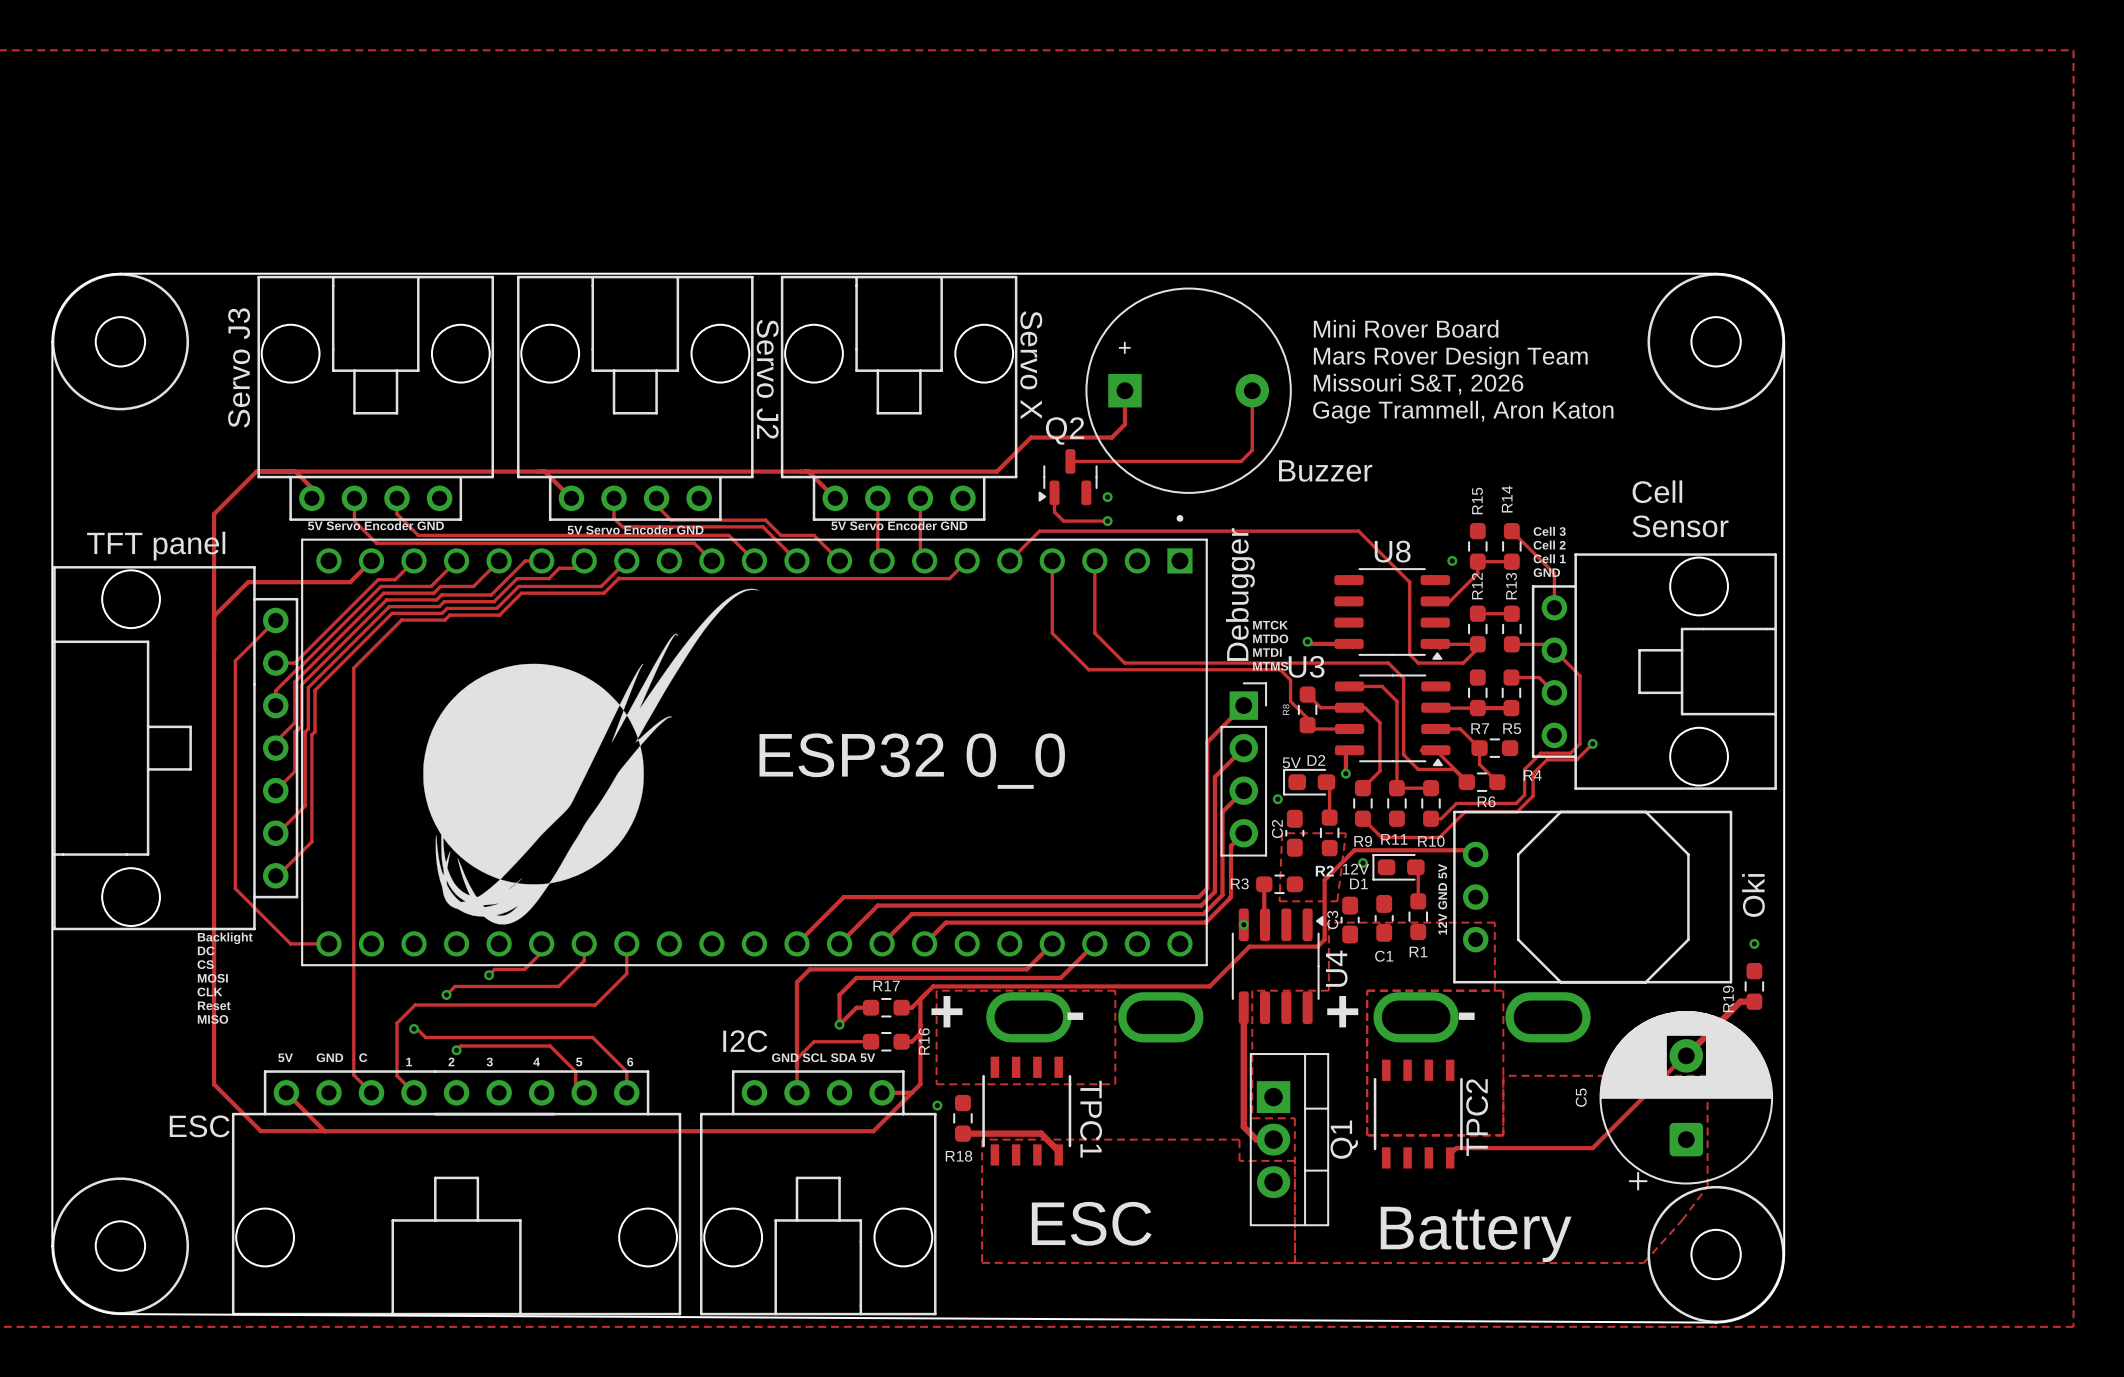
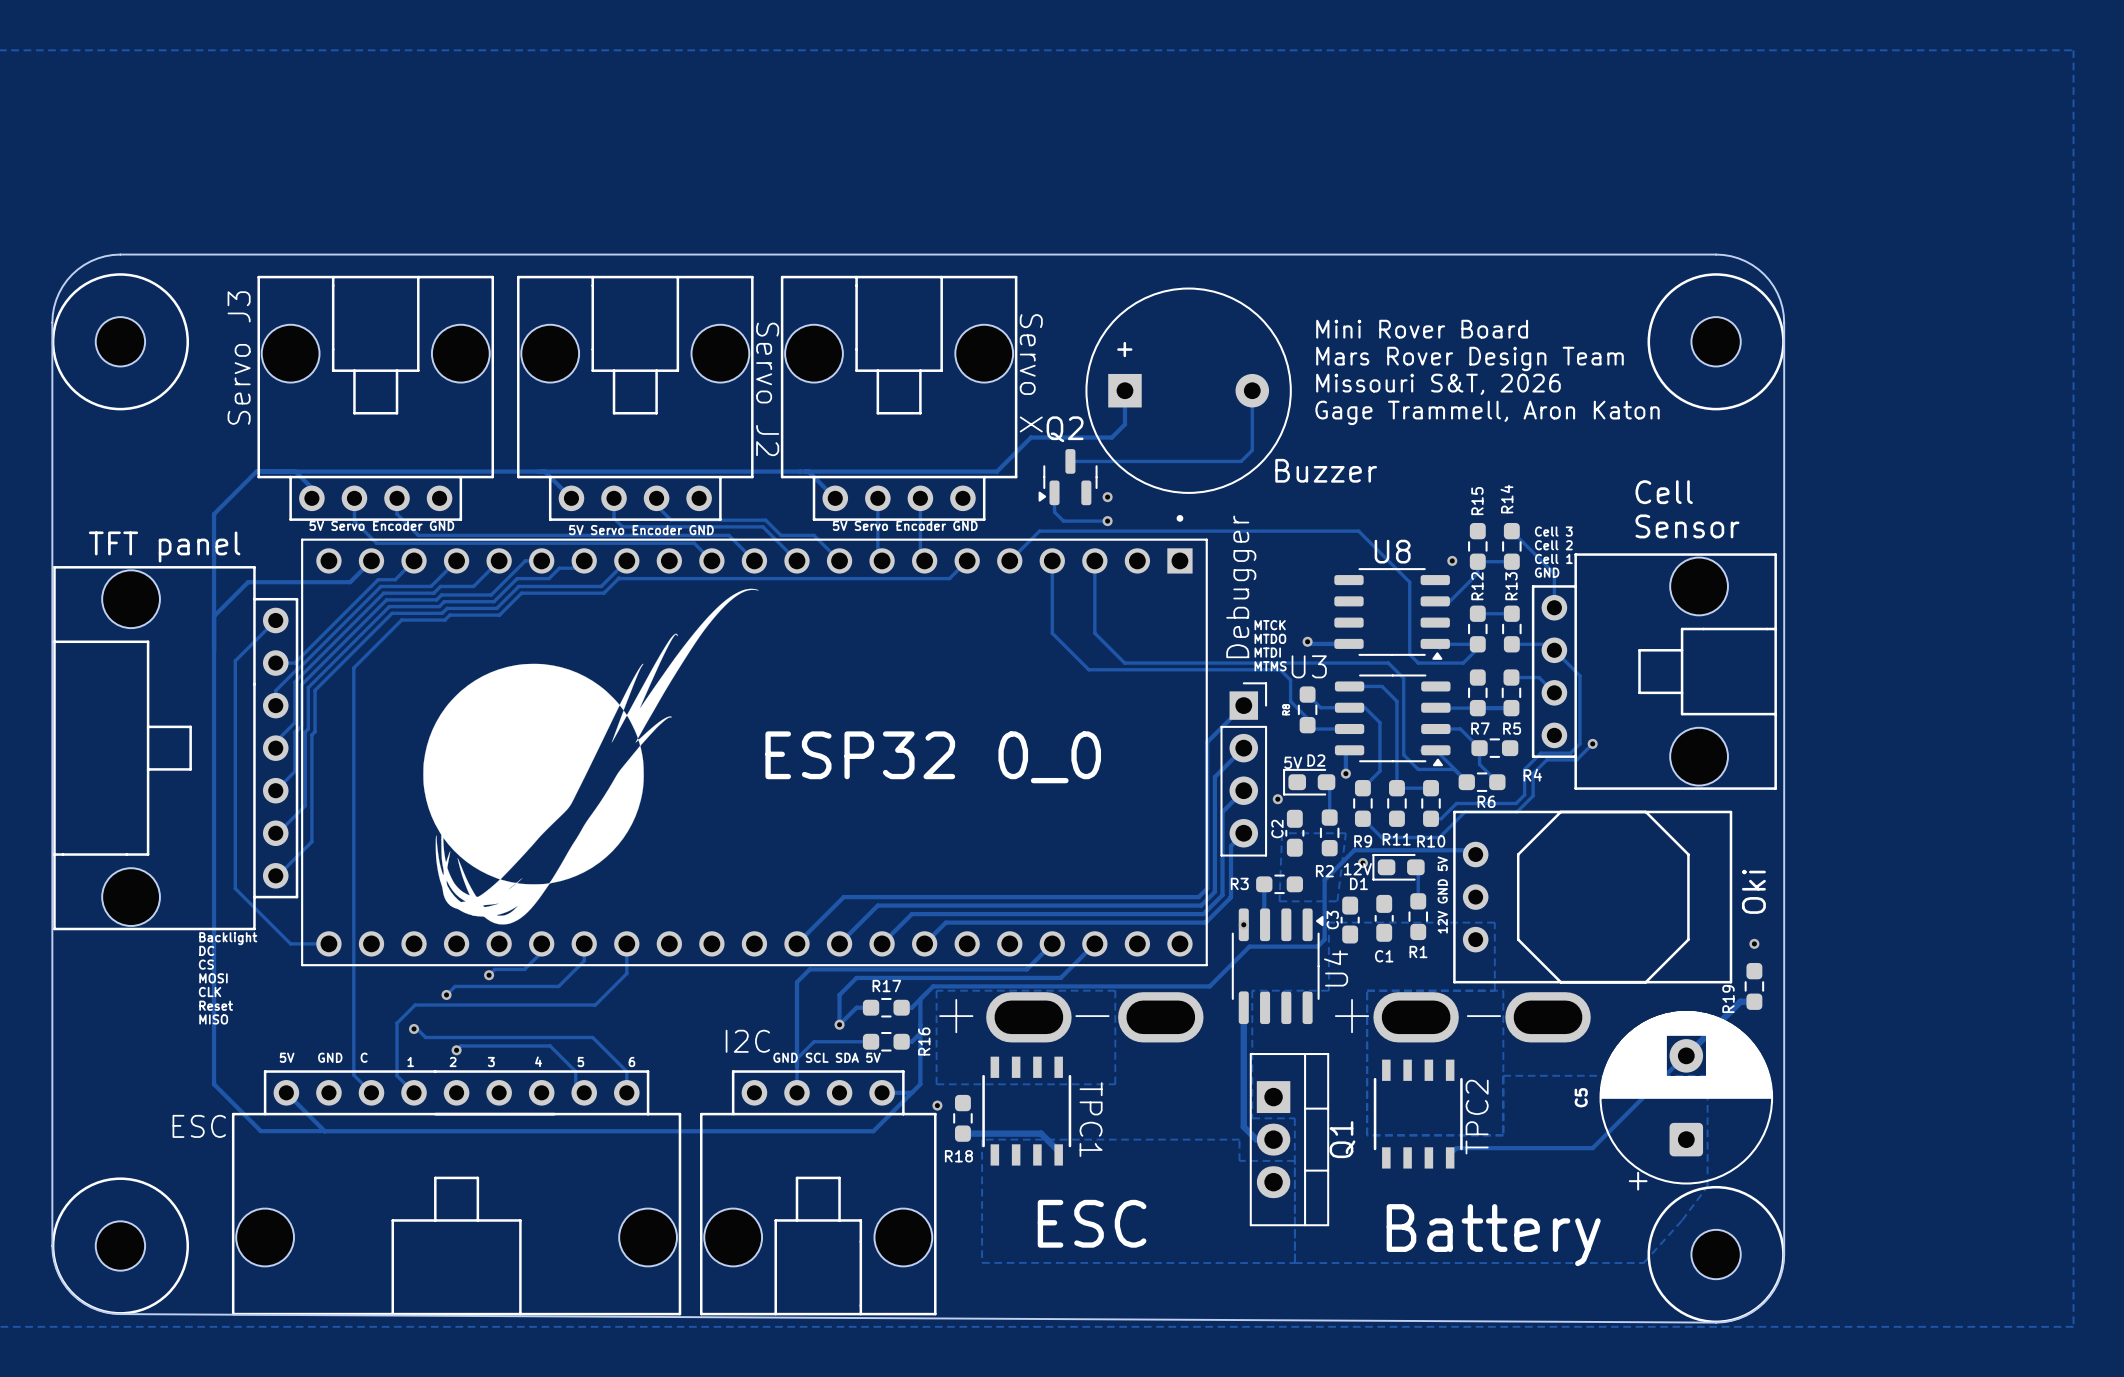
board edge: (52, 341) (54, 326) (59, 312) (72, 293) (90, 280) (105, 275) (120, 273) (1716, 273) (1738, 277) (1752, 284) (1764, 293) (1773, 305) (1780, 319) (1784, 341) -> (52, 341) (54, 307) (59, 293) (67, 280) (77, 269) (90, 261) (105, 256) (120, 254) (1716, 254) (1731, 256) (1745, 261) (1758, 269) (1769, 280) (1777, 293) (1782, 307) (1784, 341)

